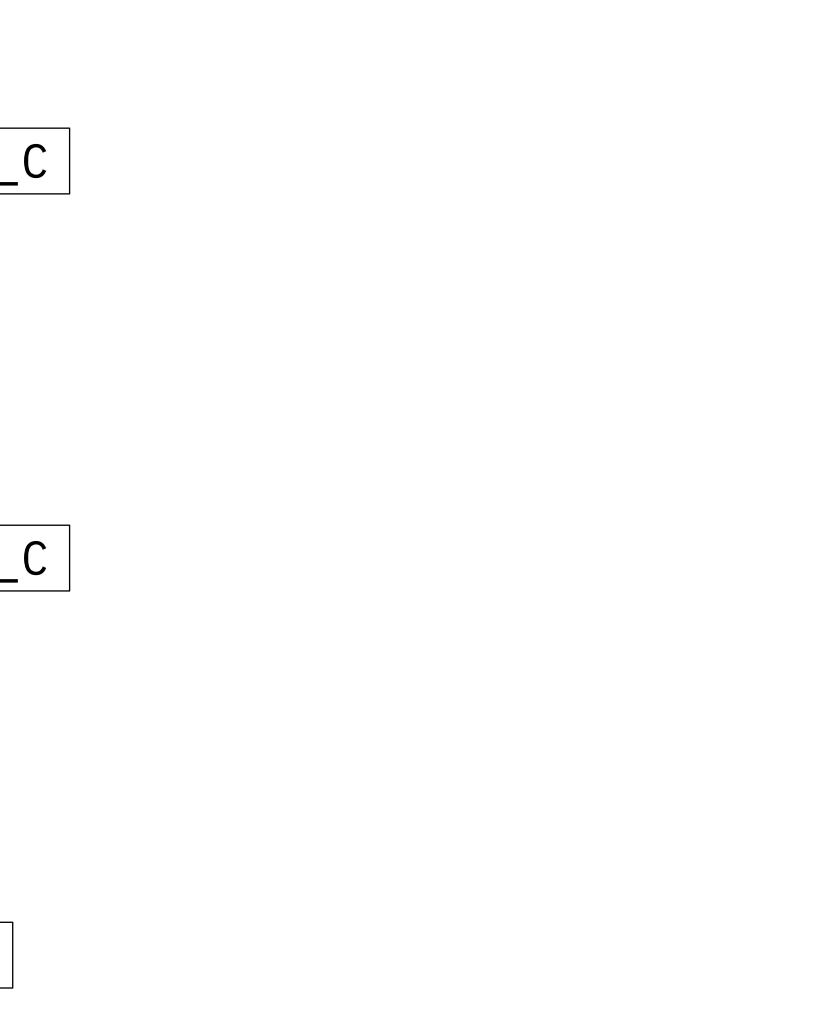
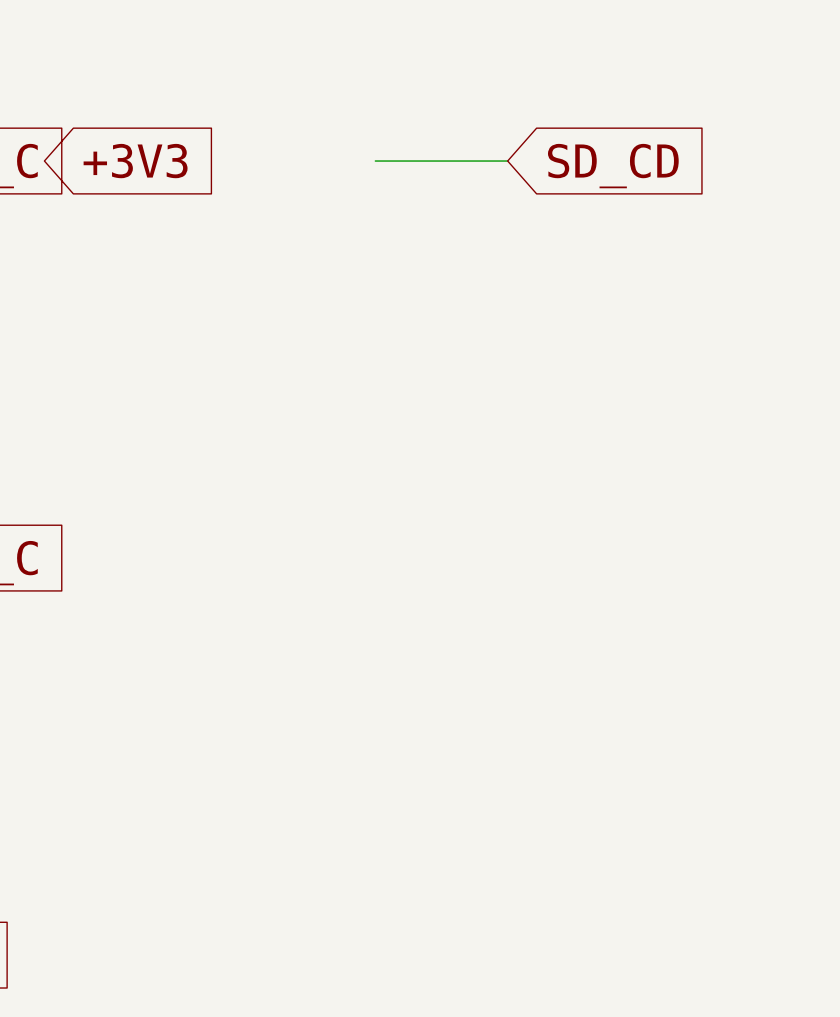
global label: none -> +3V3 (135, 161)
wire: none -> (375, 161) (507, 161)
global label: none -> SD_CD (613, 166)

